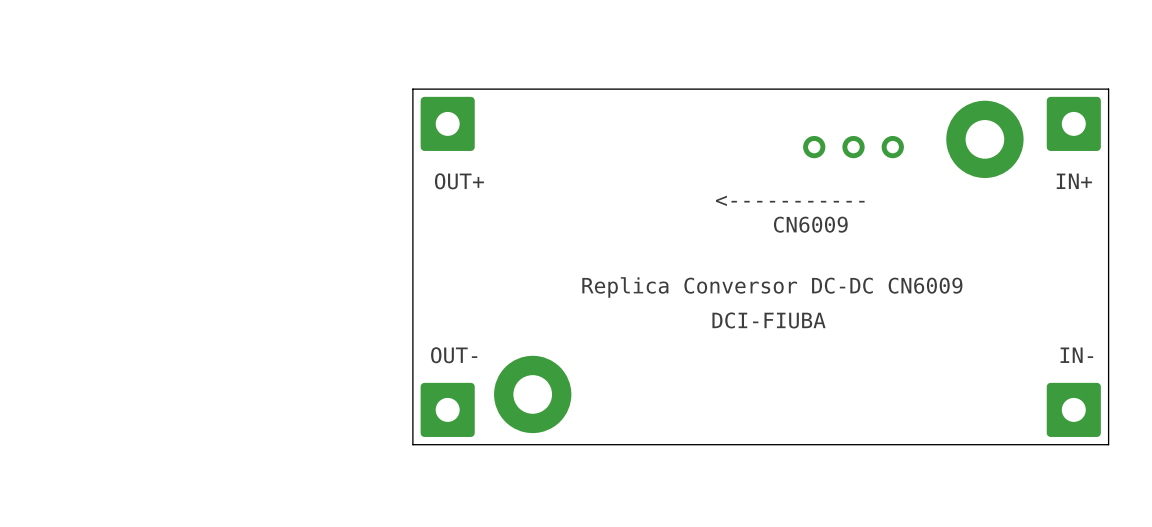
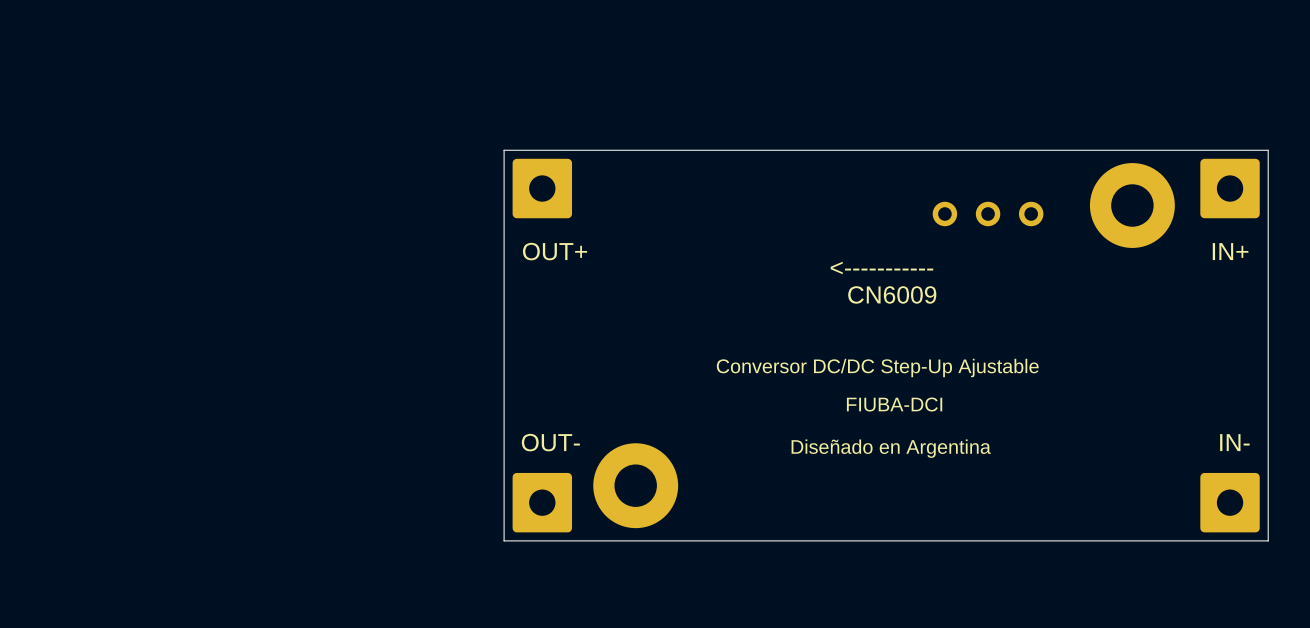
text position: <----------- (790, 200) -> <----------- (881, 267)
text position: CN6009 (810, 224) -> CN6009 (892, 294)
text: none -> Conversor DC/DC Step-Up Ajustable (877, 368)
text: Replica Conversor DC-DC CN6009 (772, 287) -> none
text: DCI-FIUBA (768, 320) -> FIUBA-DCI (894, 404)
text: none -> Diseñado en Argentina (891, 448)

